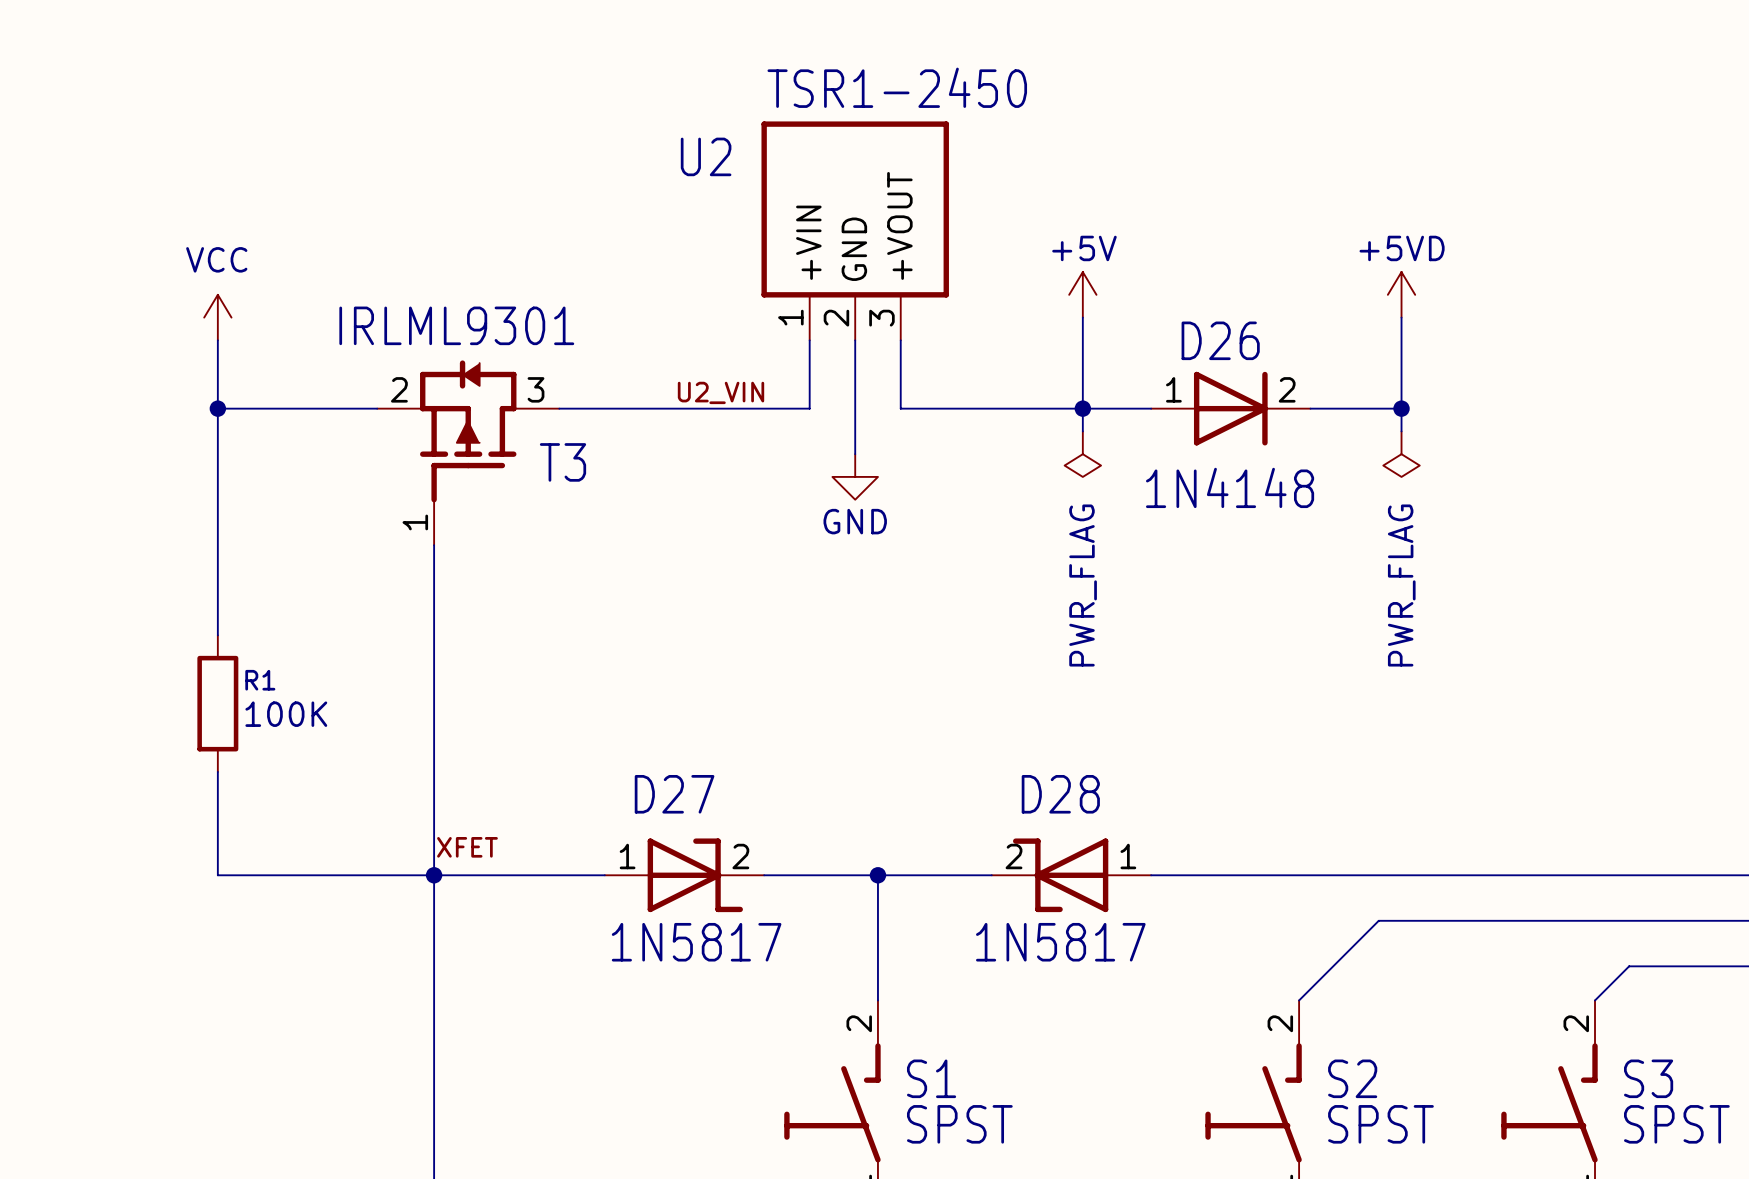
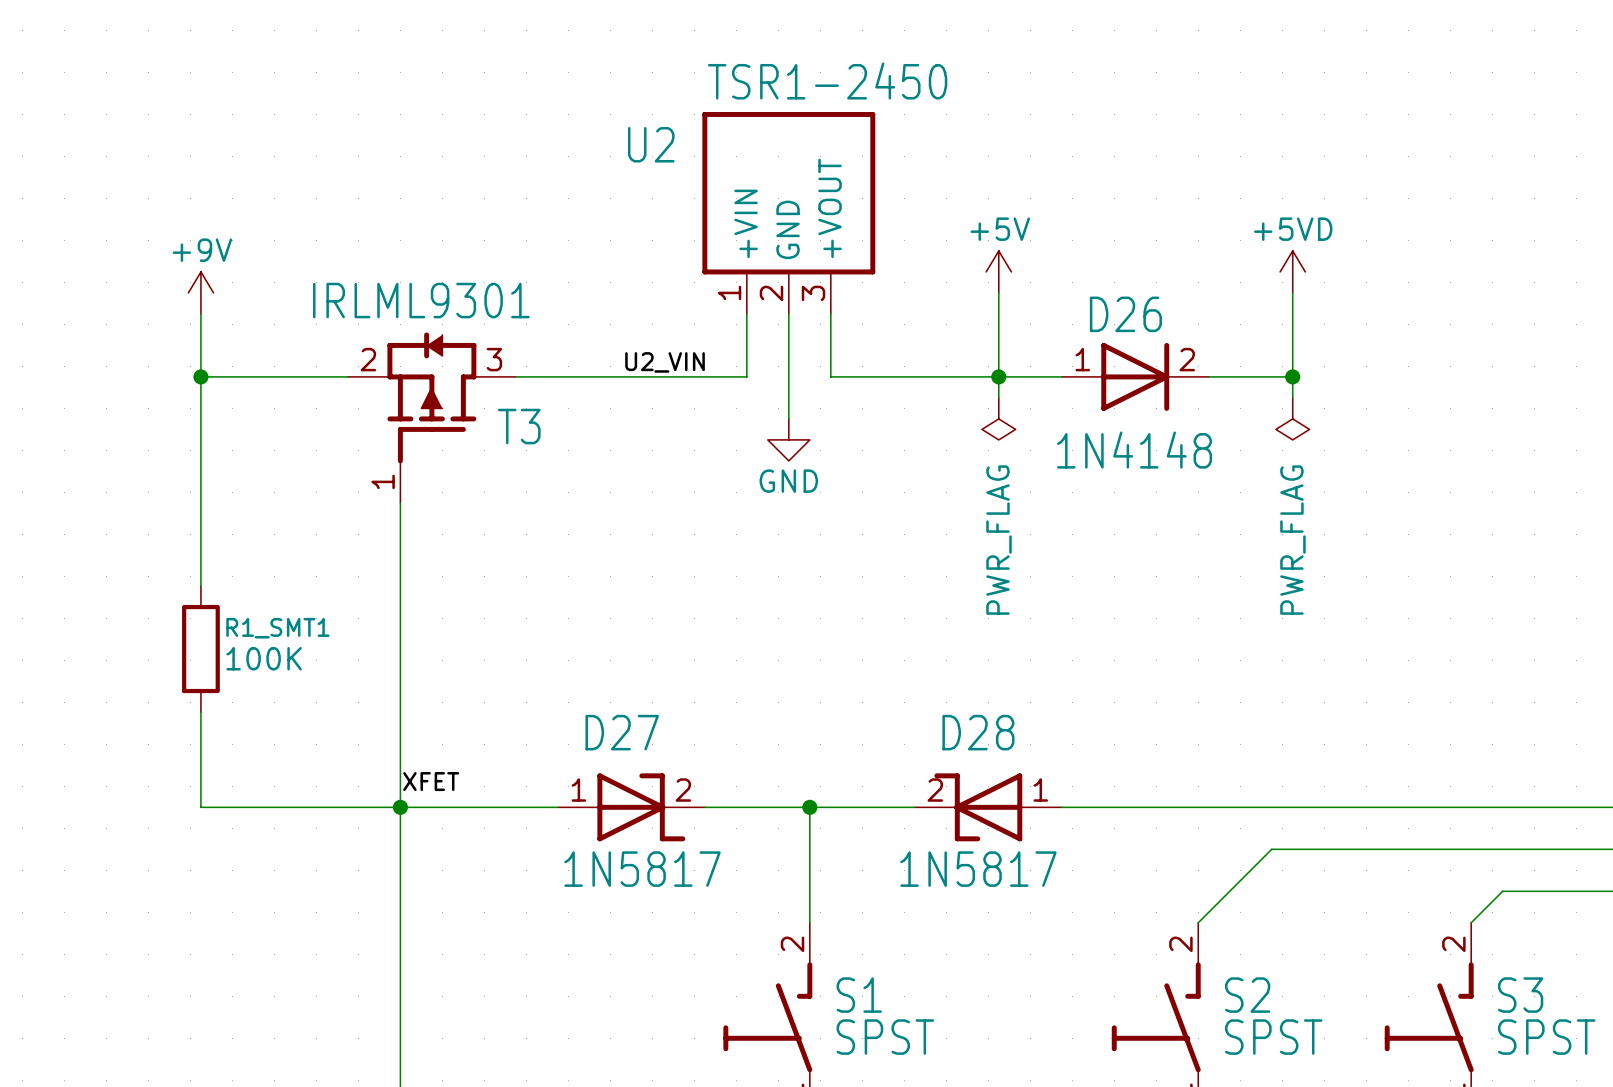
power symbol: VCC (217, 317) -> +9V (200, 292)
R1 name: R1 (260, 680) -> R1_SMT1 (277, 628)

